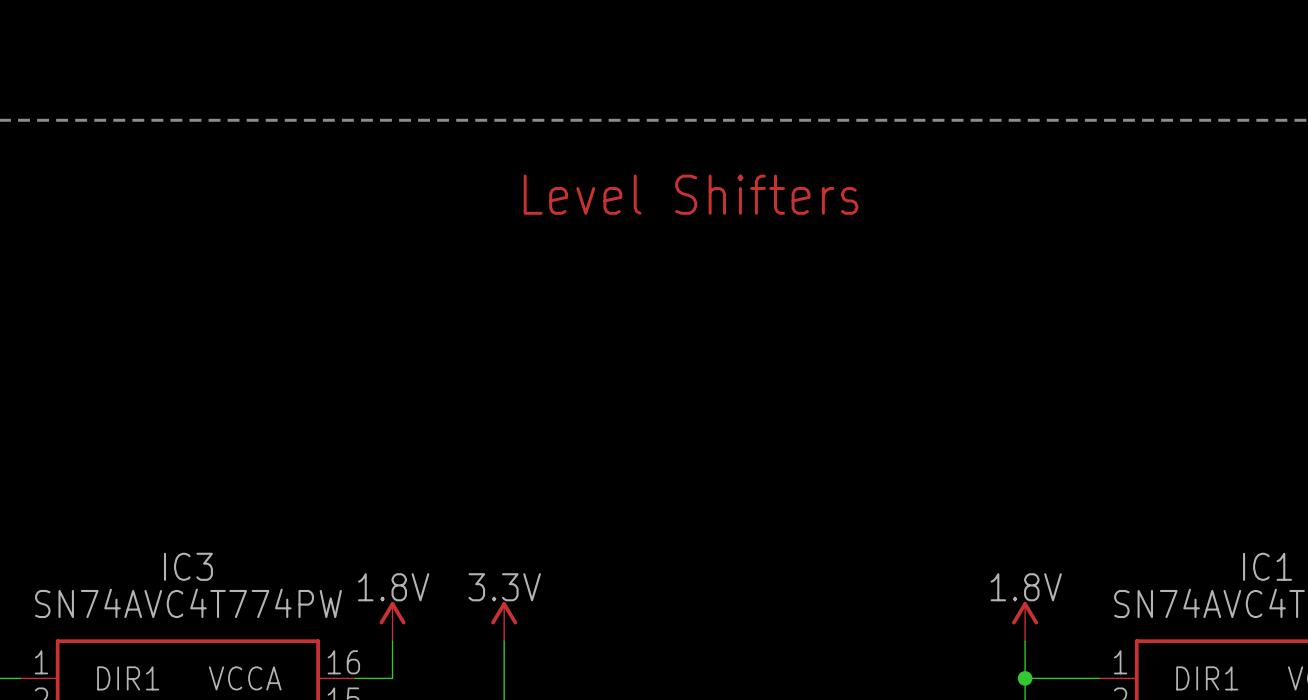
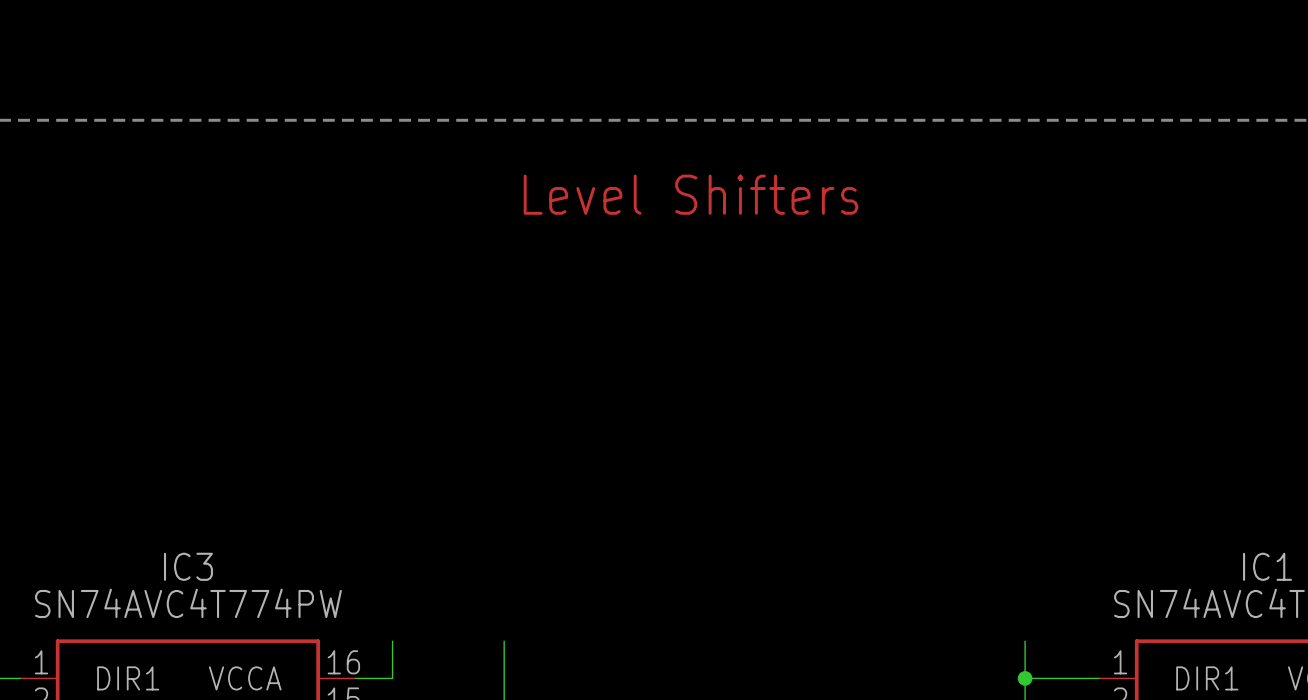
power symbol: 1.8V (392, 621) -> none
power symbol: 3.3V (504, 621) -> none
power symbol: 1.8V (1025, 621) -> none

